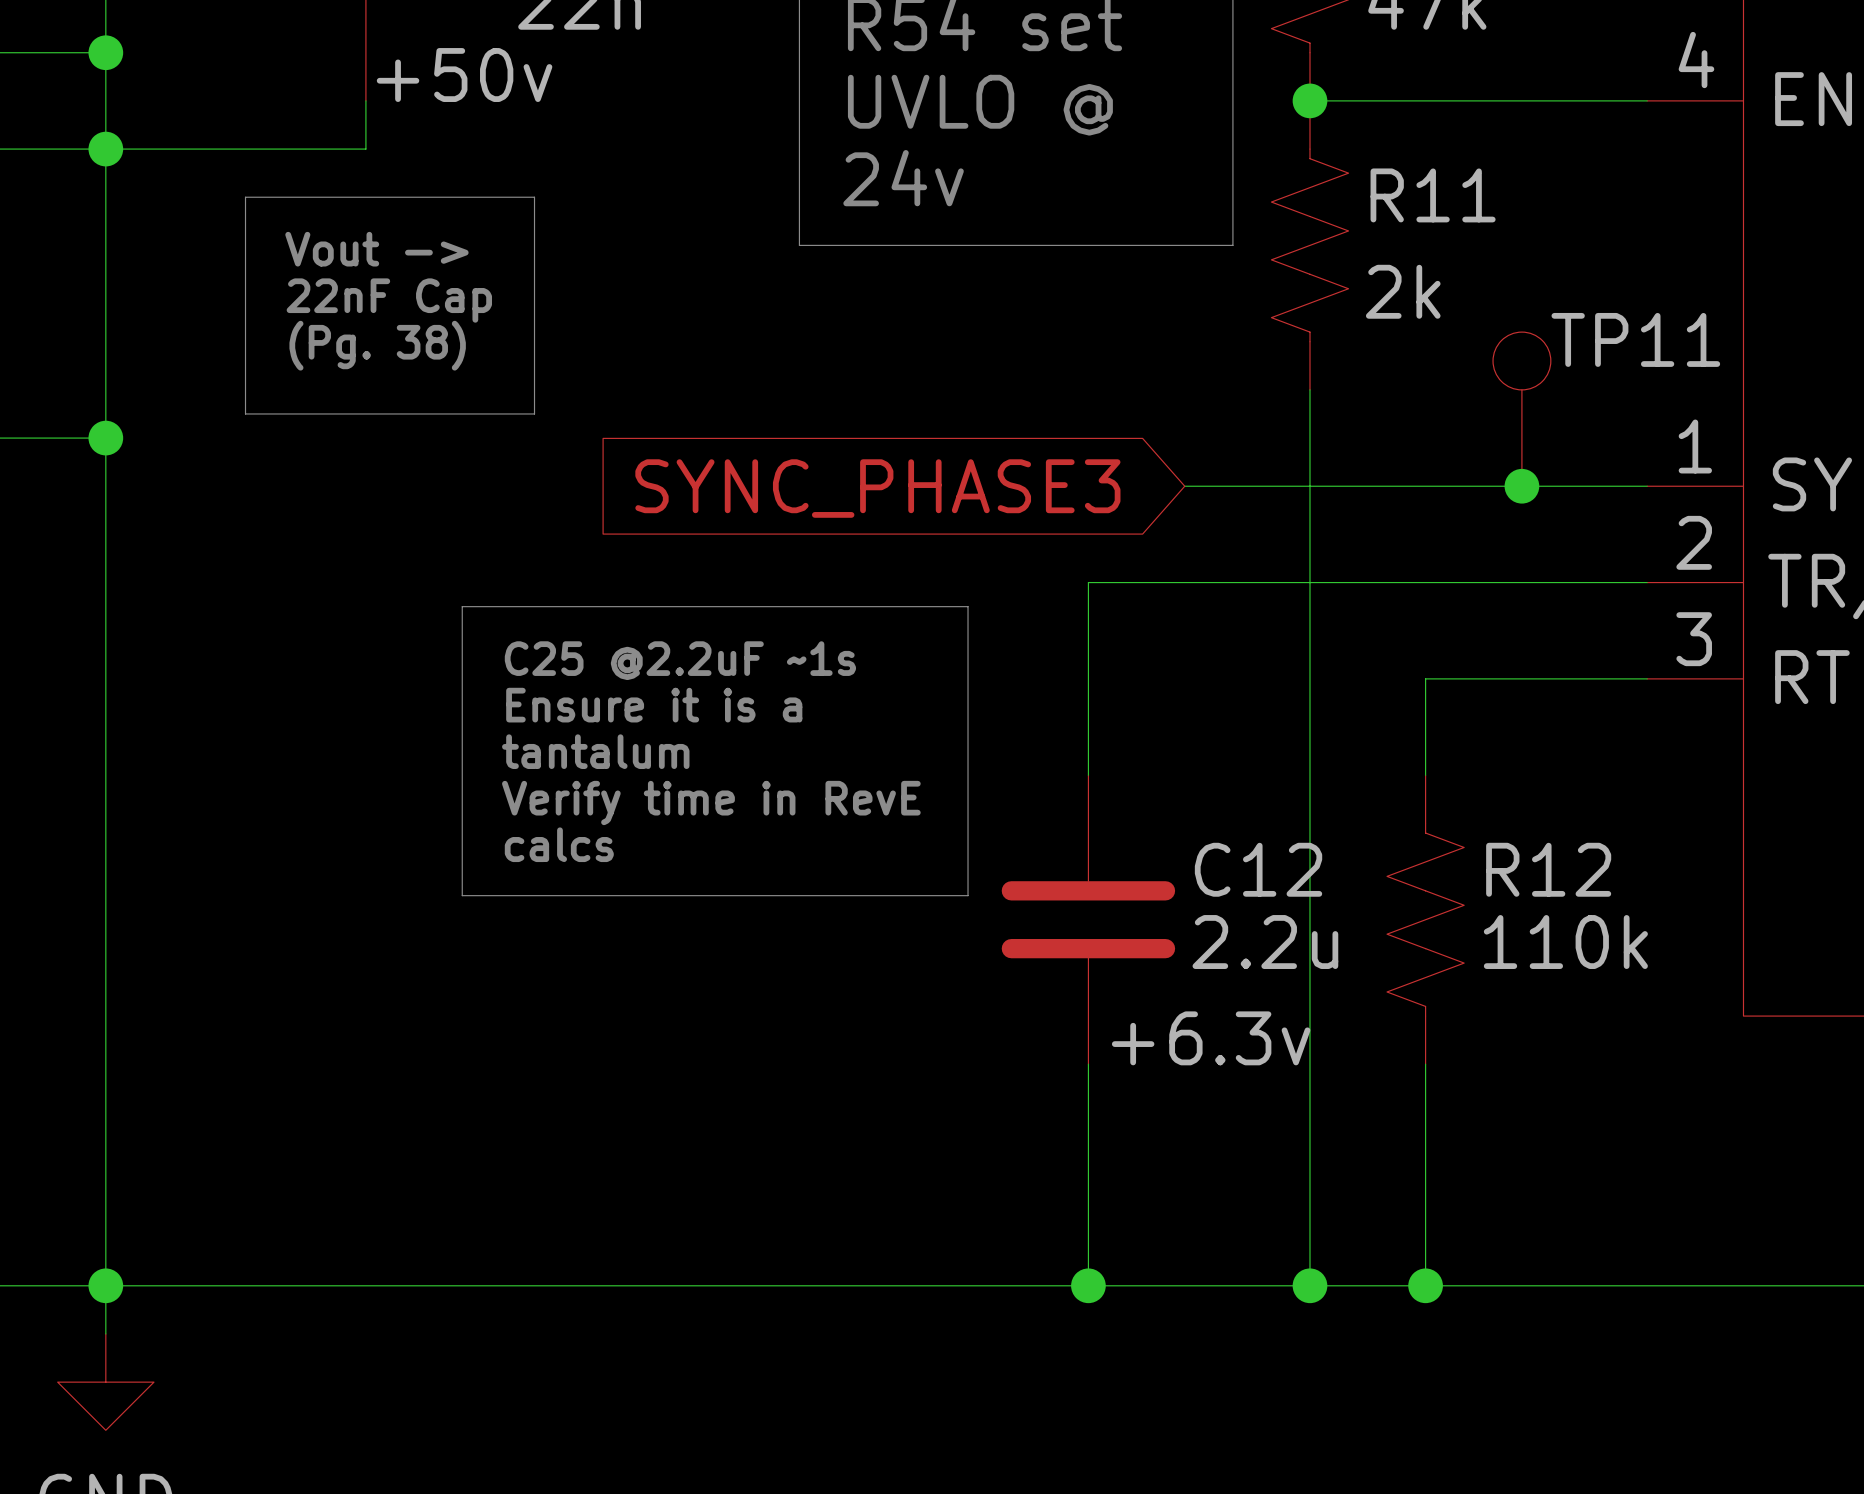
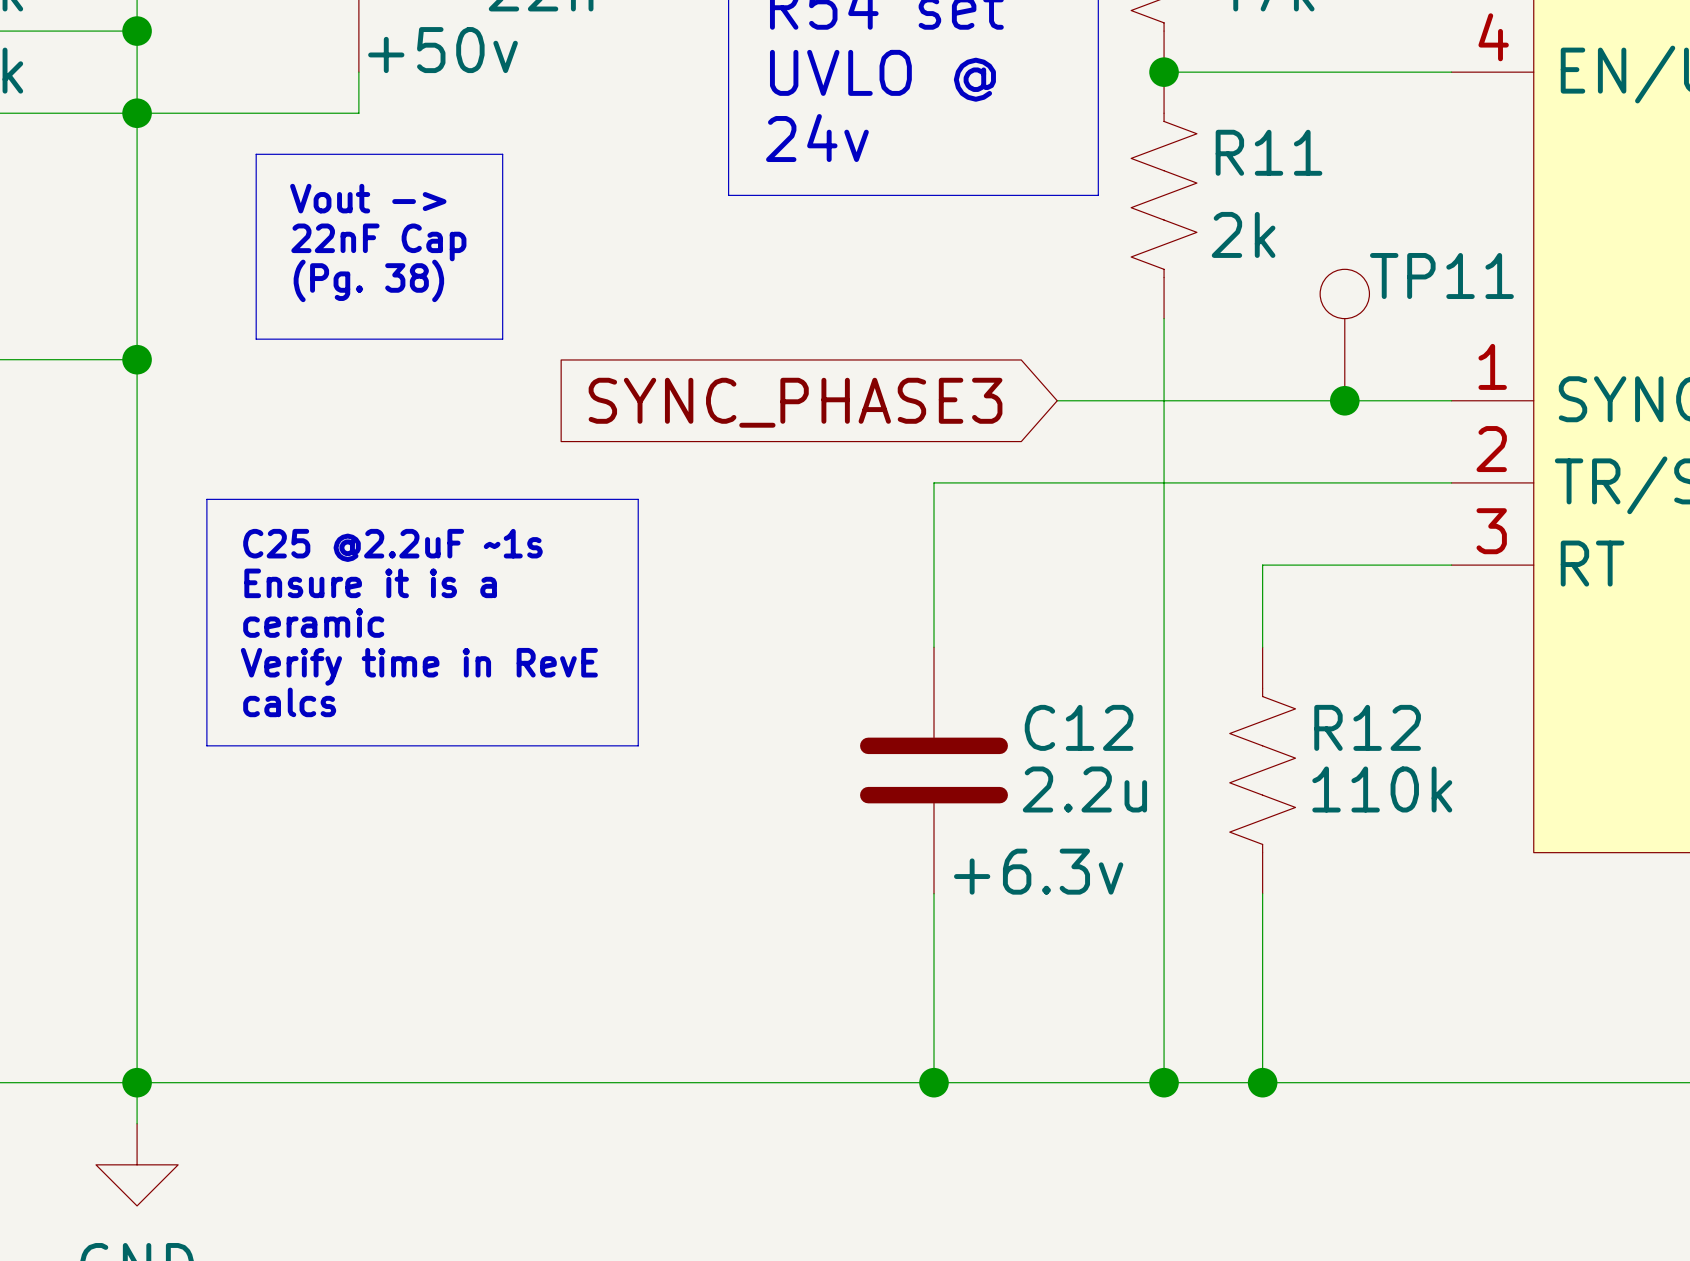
wire: (1088, 582) (1088, 775) -> (975, 482) (934, 482) (934, 647)
line: (462, 606) (968, 606) (968, 895) (462, 895) (462, 606) -> (206, 499) (638, 499) (638, 745) (206, 745) (206, 499)
text position: C25 @2.2uF ~1s (680, 660) -> C25 @2.2uF ~1s (392, 545)
text position: Ensure it is a (654, 705) -> Ensure it is a (370, 583)
text: none -> ceramic (313, 623)
text: tantalum (595, 751) -> none
text position: Verify time in RevE (711, 803) -> Verify time in RevE (419, 666)
text position: calcs (559, 844) -> calcs (289, 702)
C12 position: (1088, 919) -> (934, 770)
wire: (1088, 1064) (1088, 1285) -> (934, 893) (934, 1082)
junction position: (1088, 1285) -> (934, 1082)

